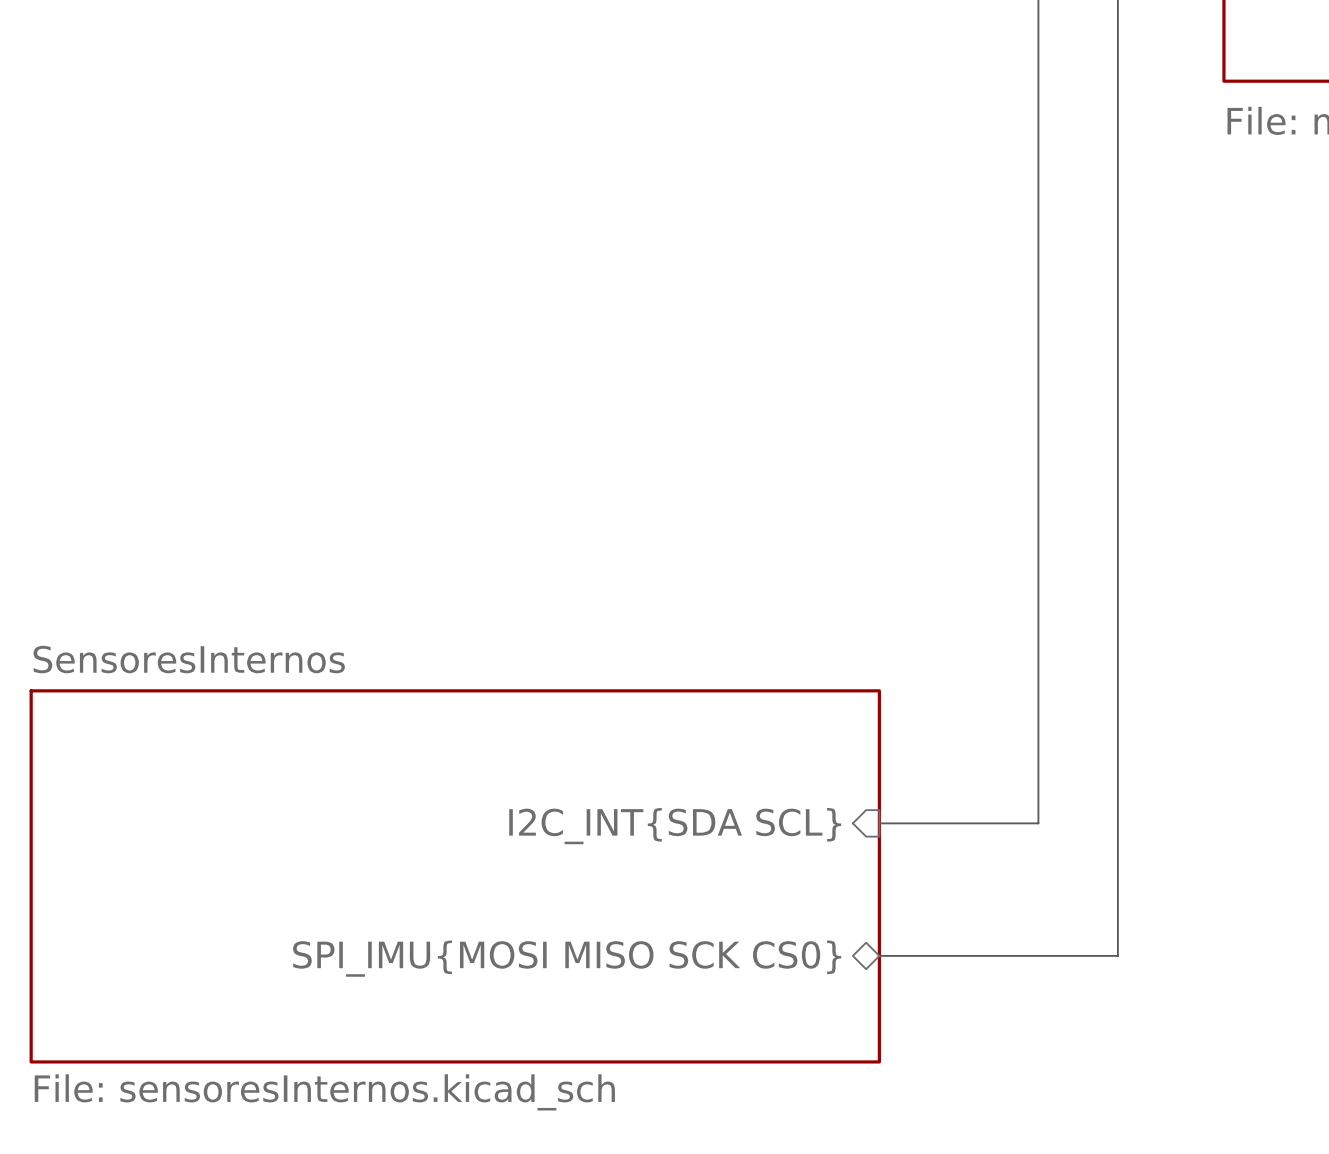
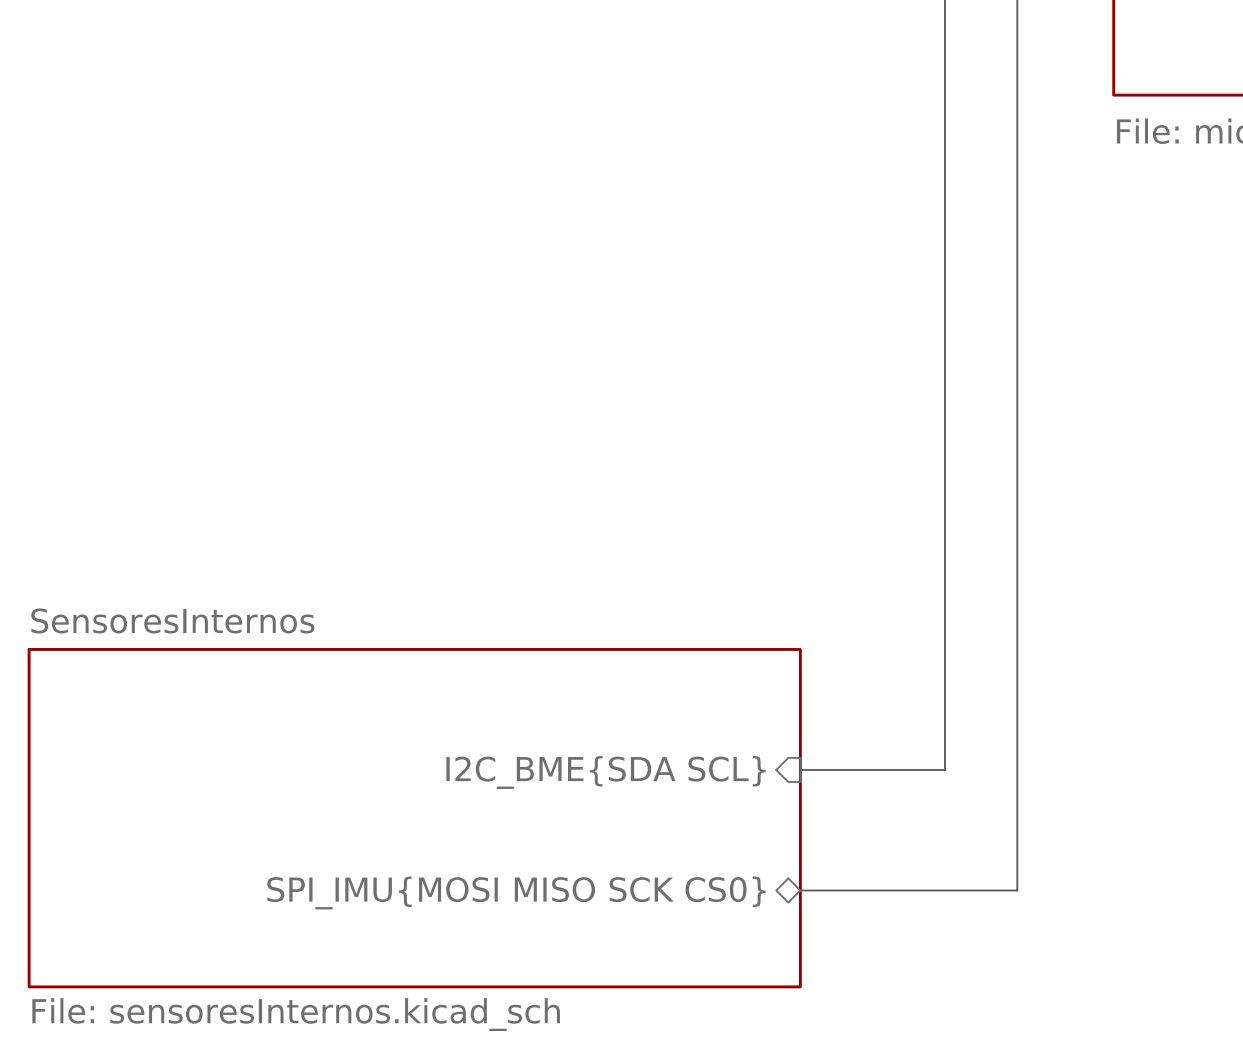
sheet pin: I2C_INT{SDA SCL} (675, 826) -> I2C_BME{SDA SCL} (606, 772)

